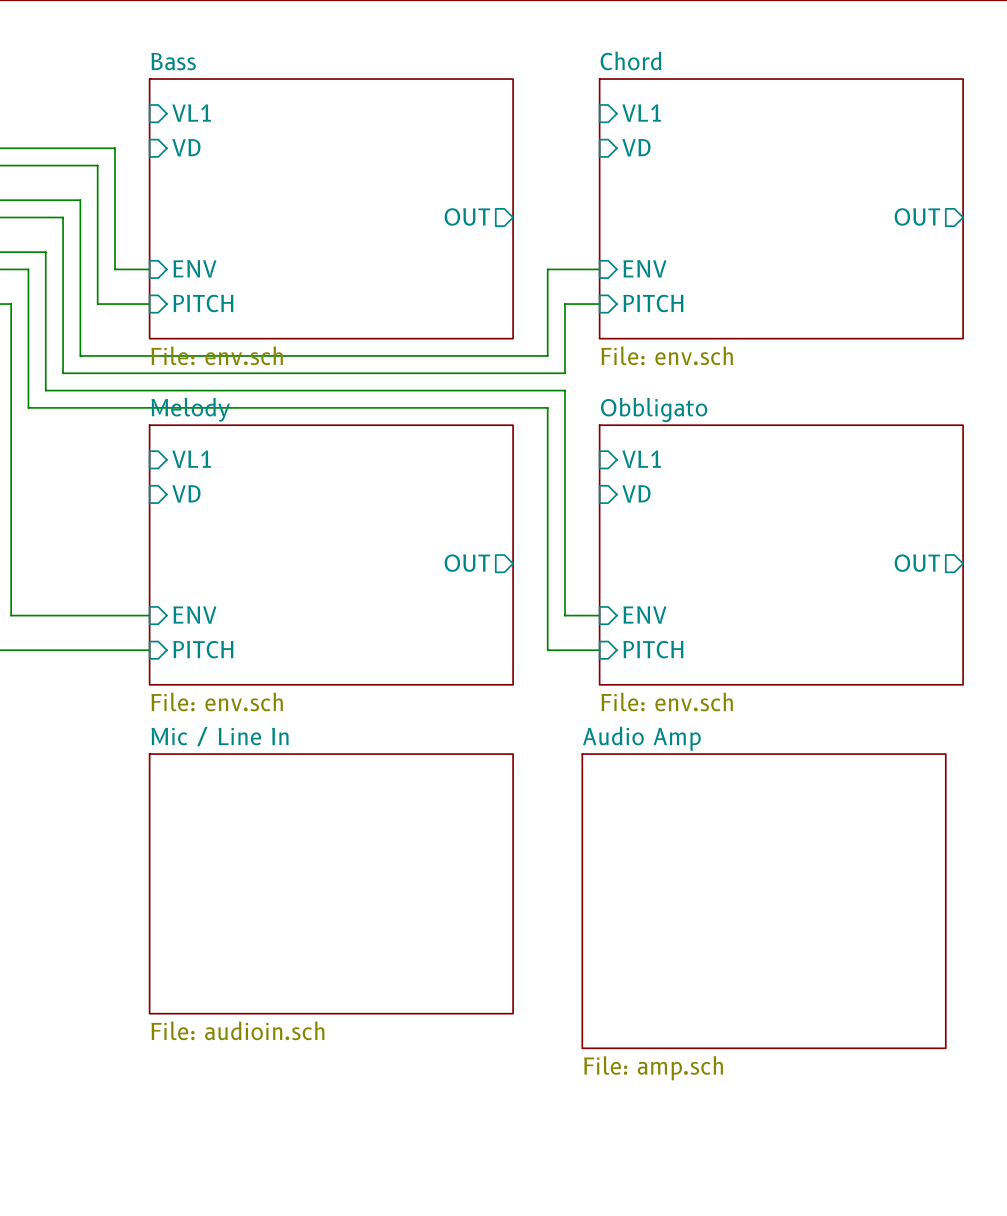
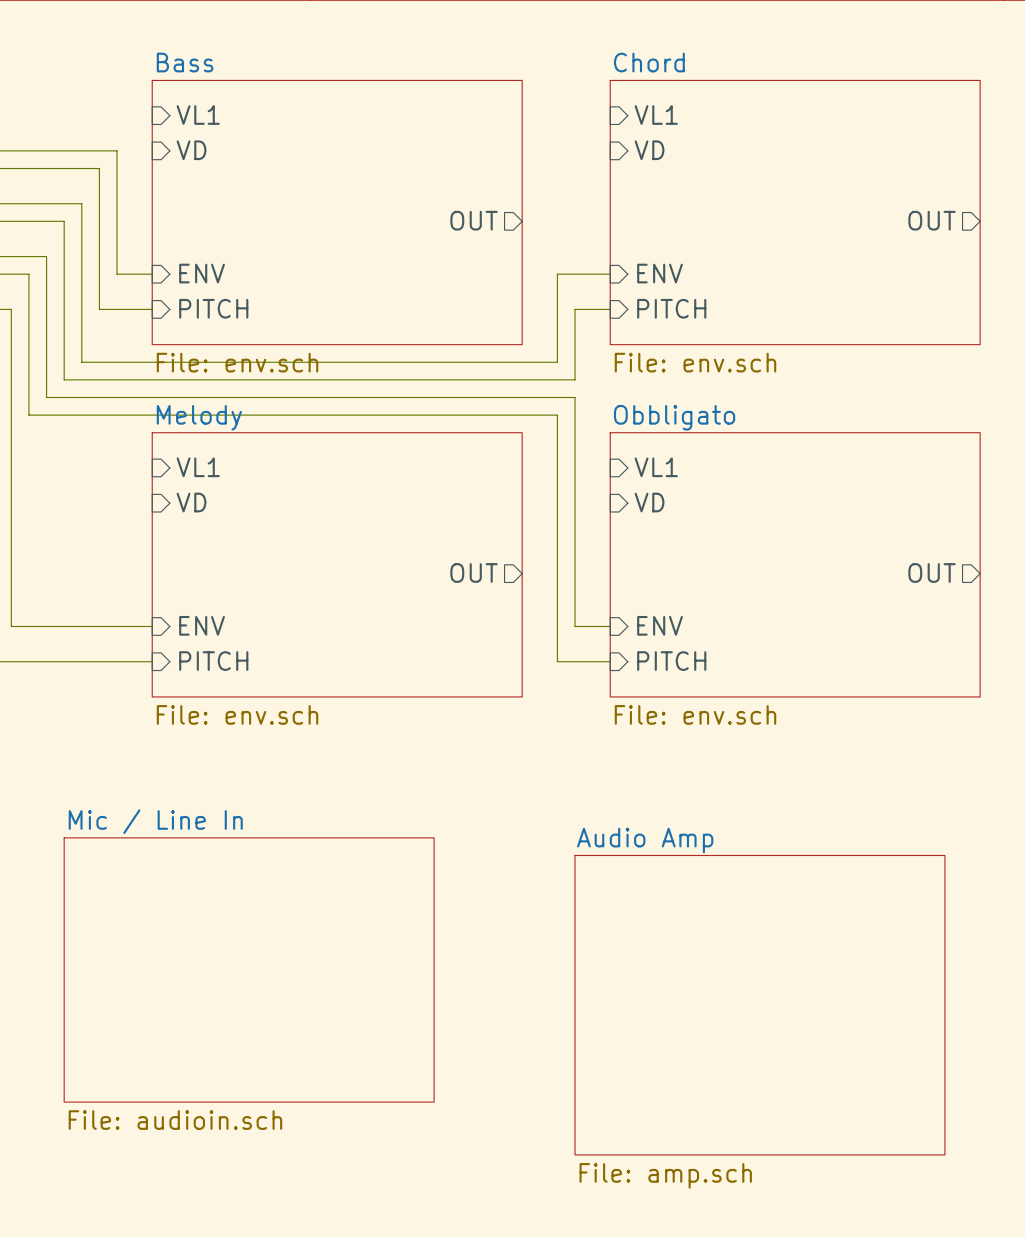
sheet Mic / Line In position: (331, 883) -> (249, 969)
sheet Audio Amp position: (764, 901) -> (759, 1005)

